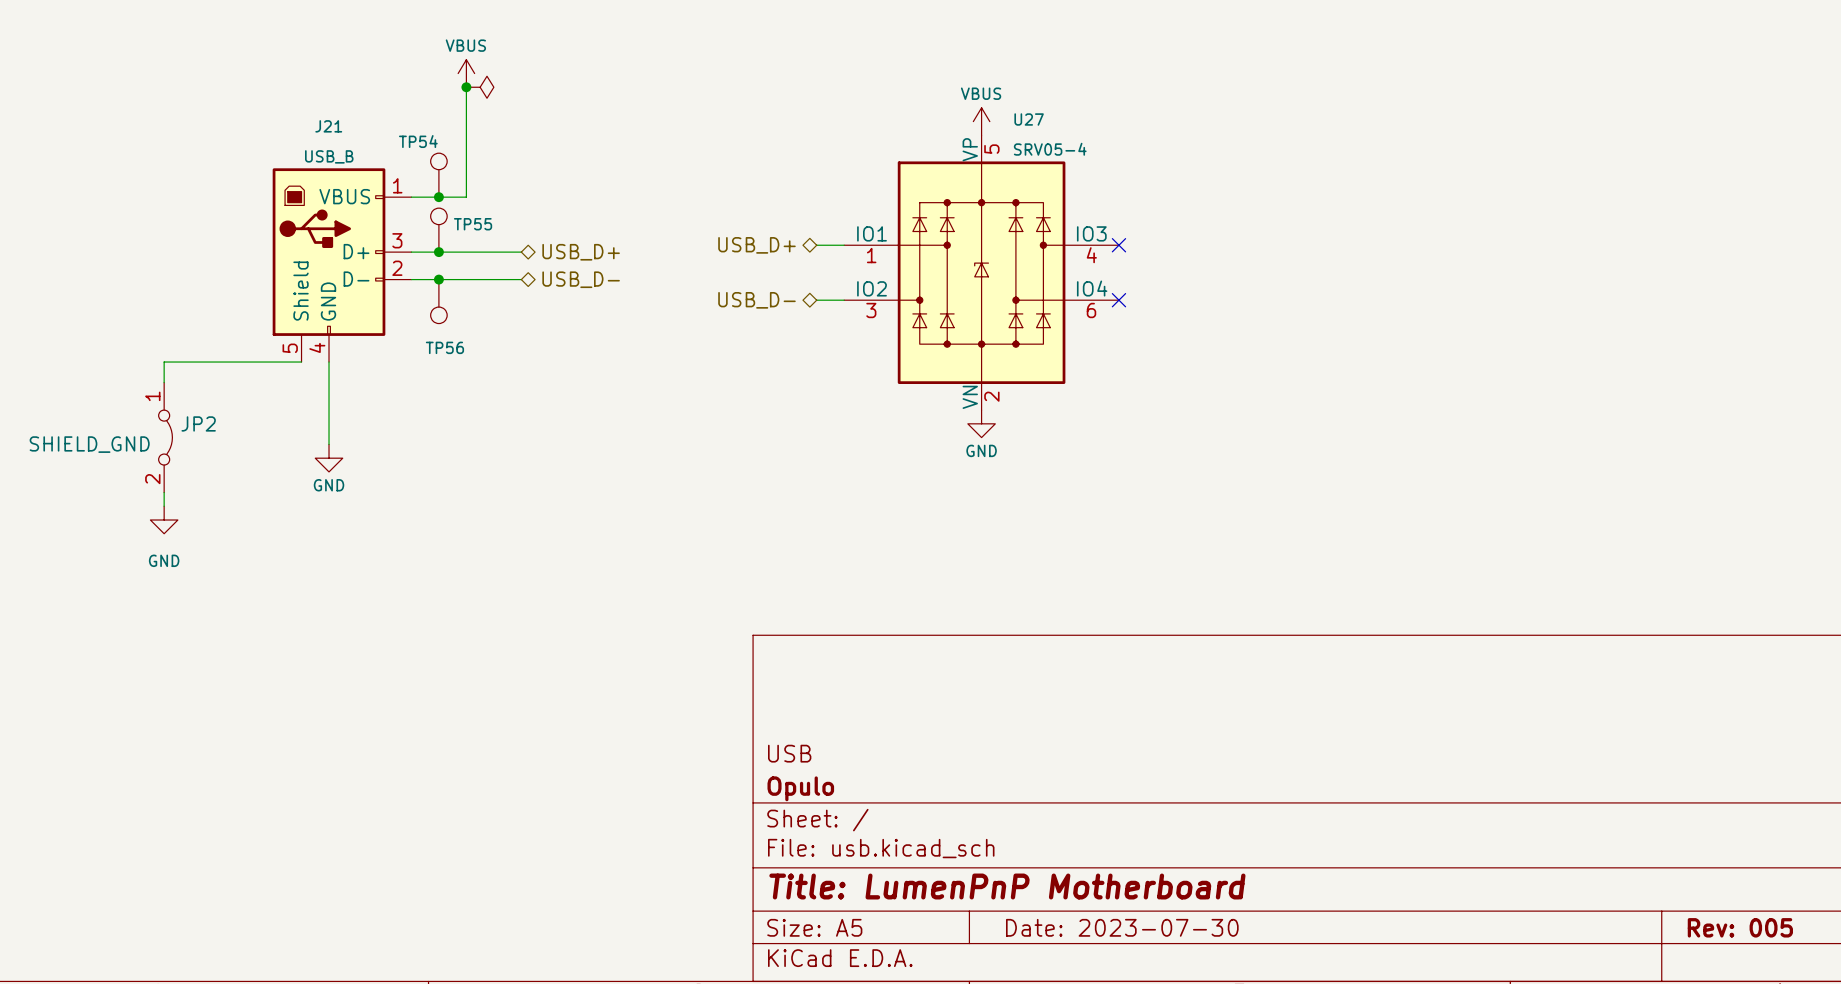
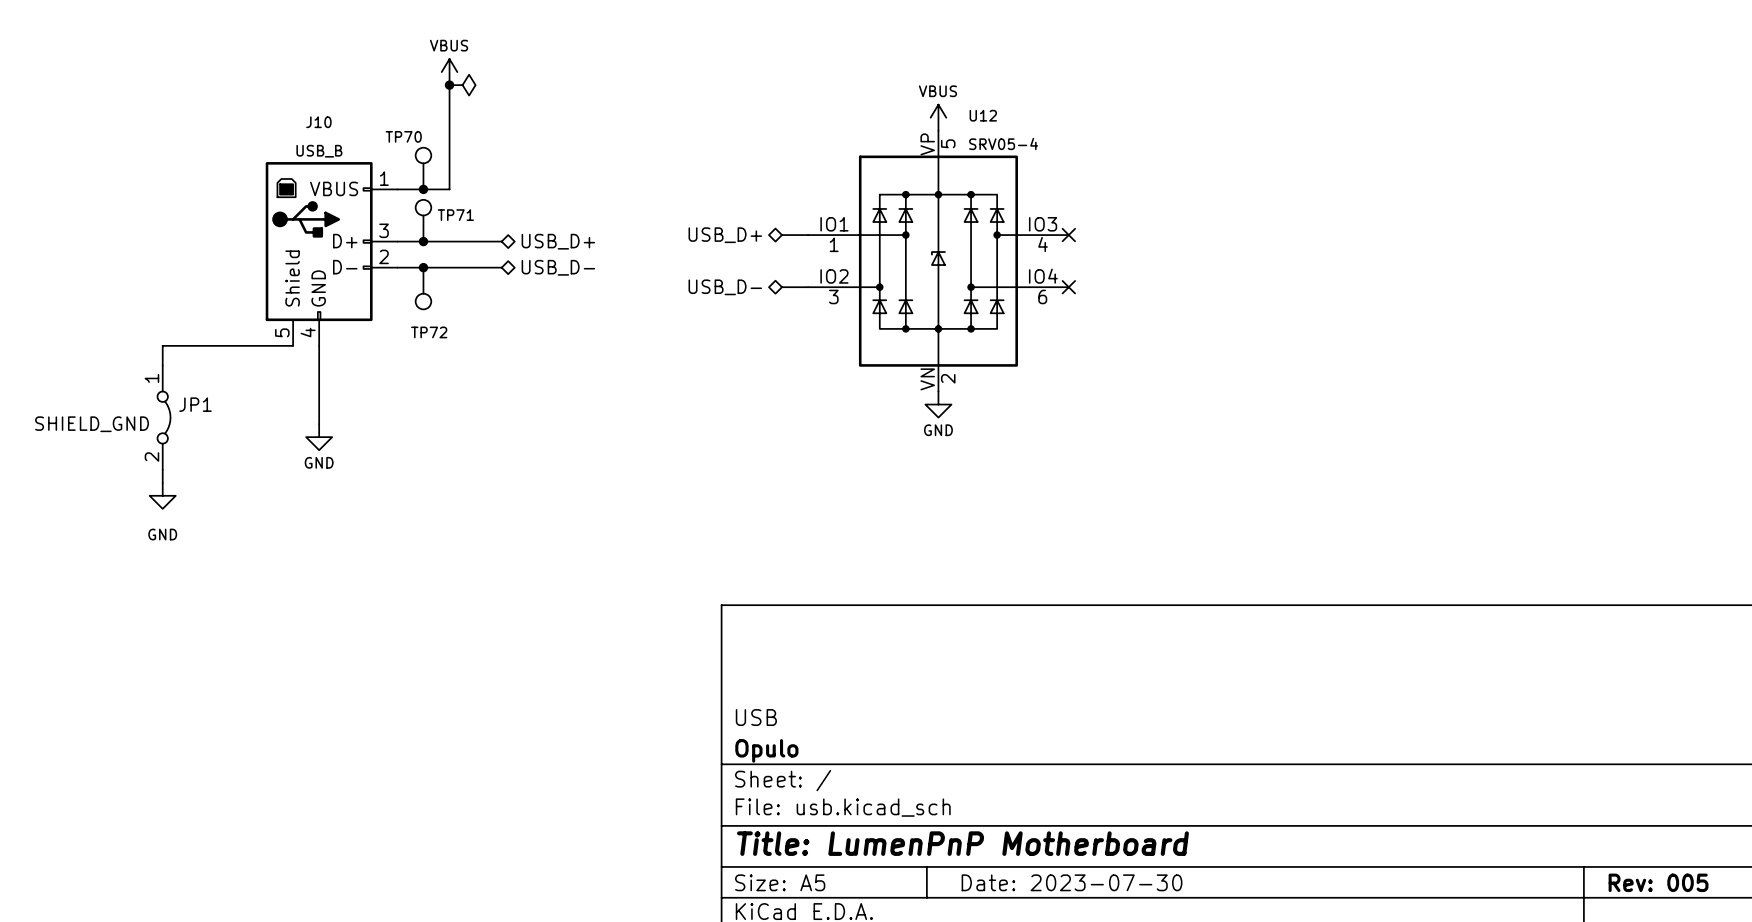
U27 name: U27 (1029, 119) -> U12 (983, 115)
J21 name: J21 (328, 126) -> J10 (318, 122)
TP54 name: TP54 (418, 141) -> TP70 (403, 136)
TP55 name: TP55 (473, 224) -> TP71 (455, 215)
TP56 name: TP56 (444, 347) -> TP72 (429, 332)
JP2 name: JP2 (198, 423) -> JP1 (195, 404)

